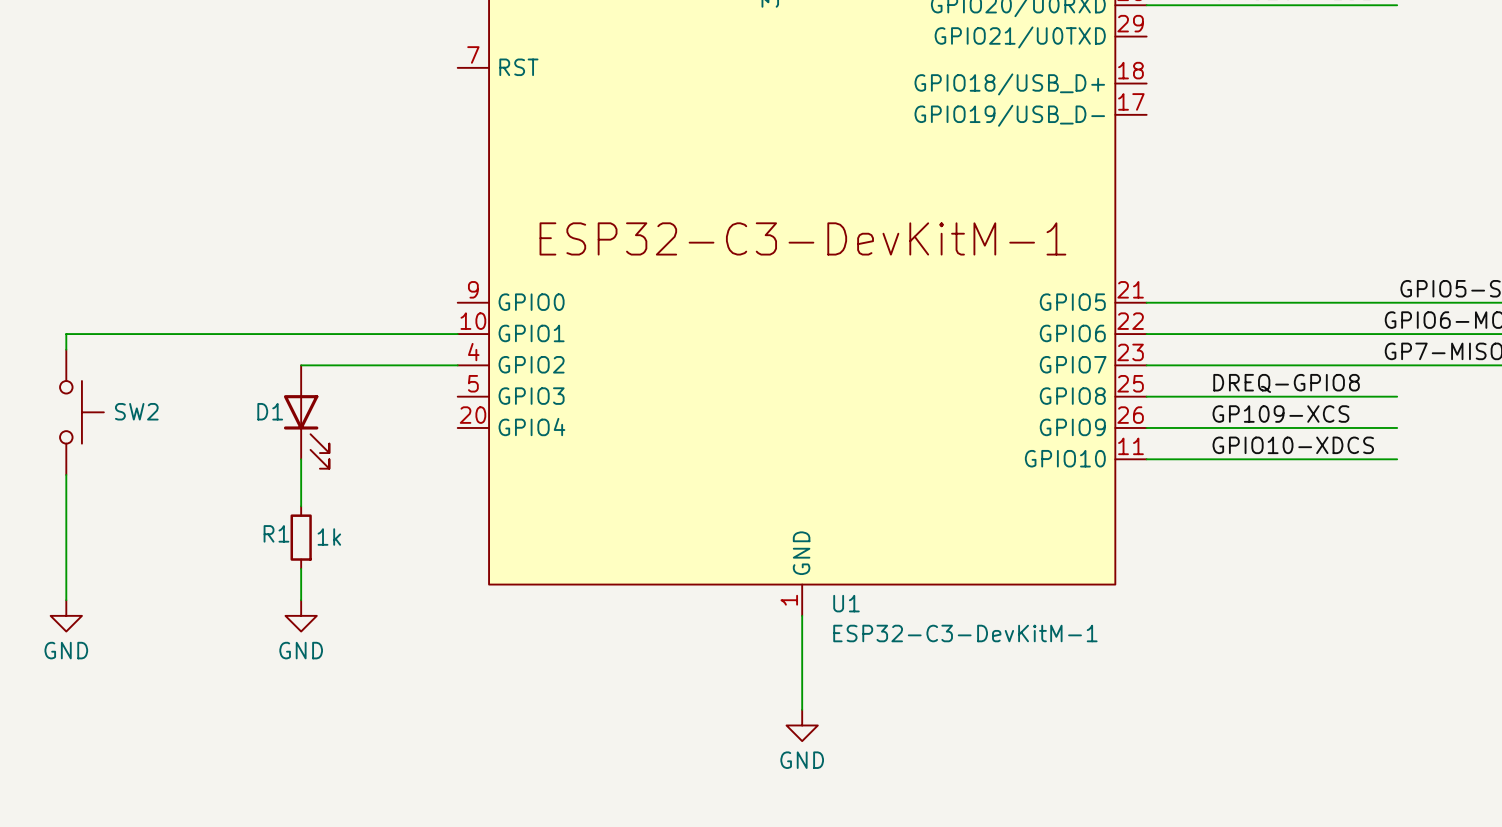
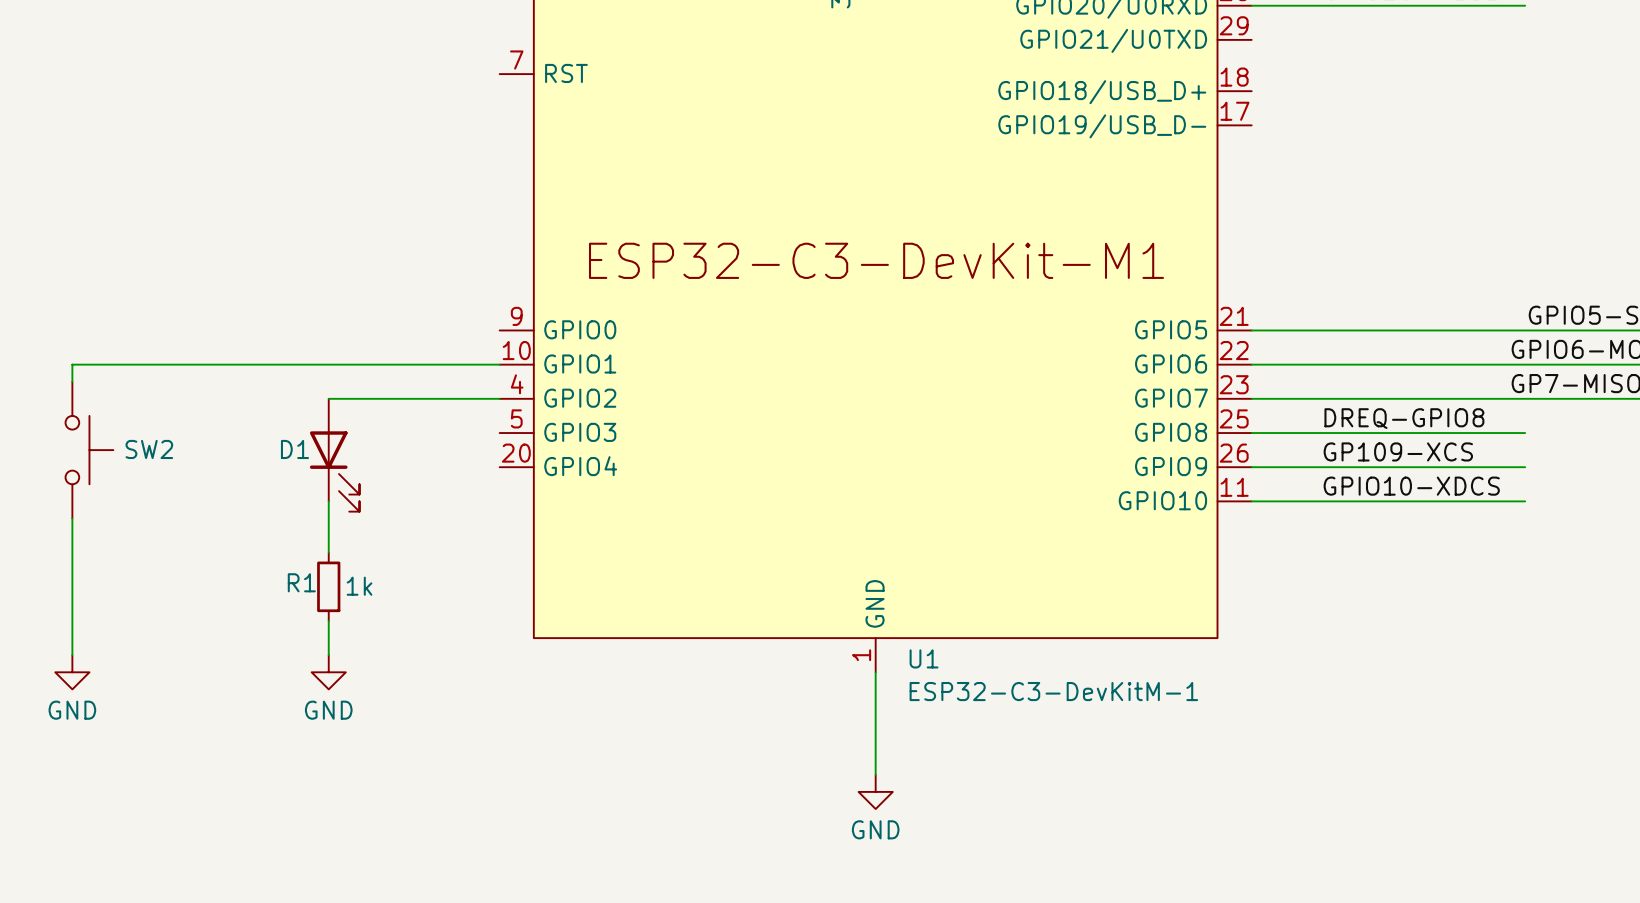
U1 text: ESP32-C3-DevKitM-1 (802, 238) -> ESP32-C3-DevKit-M1 (876, 260)

